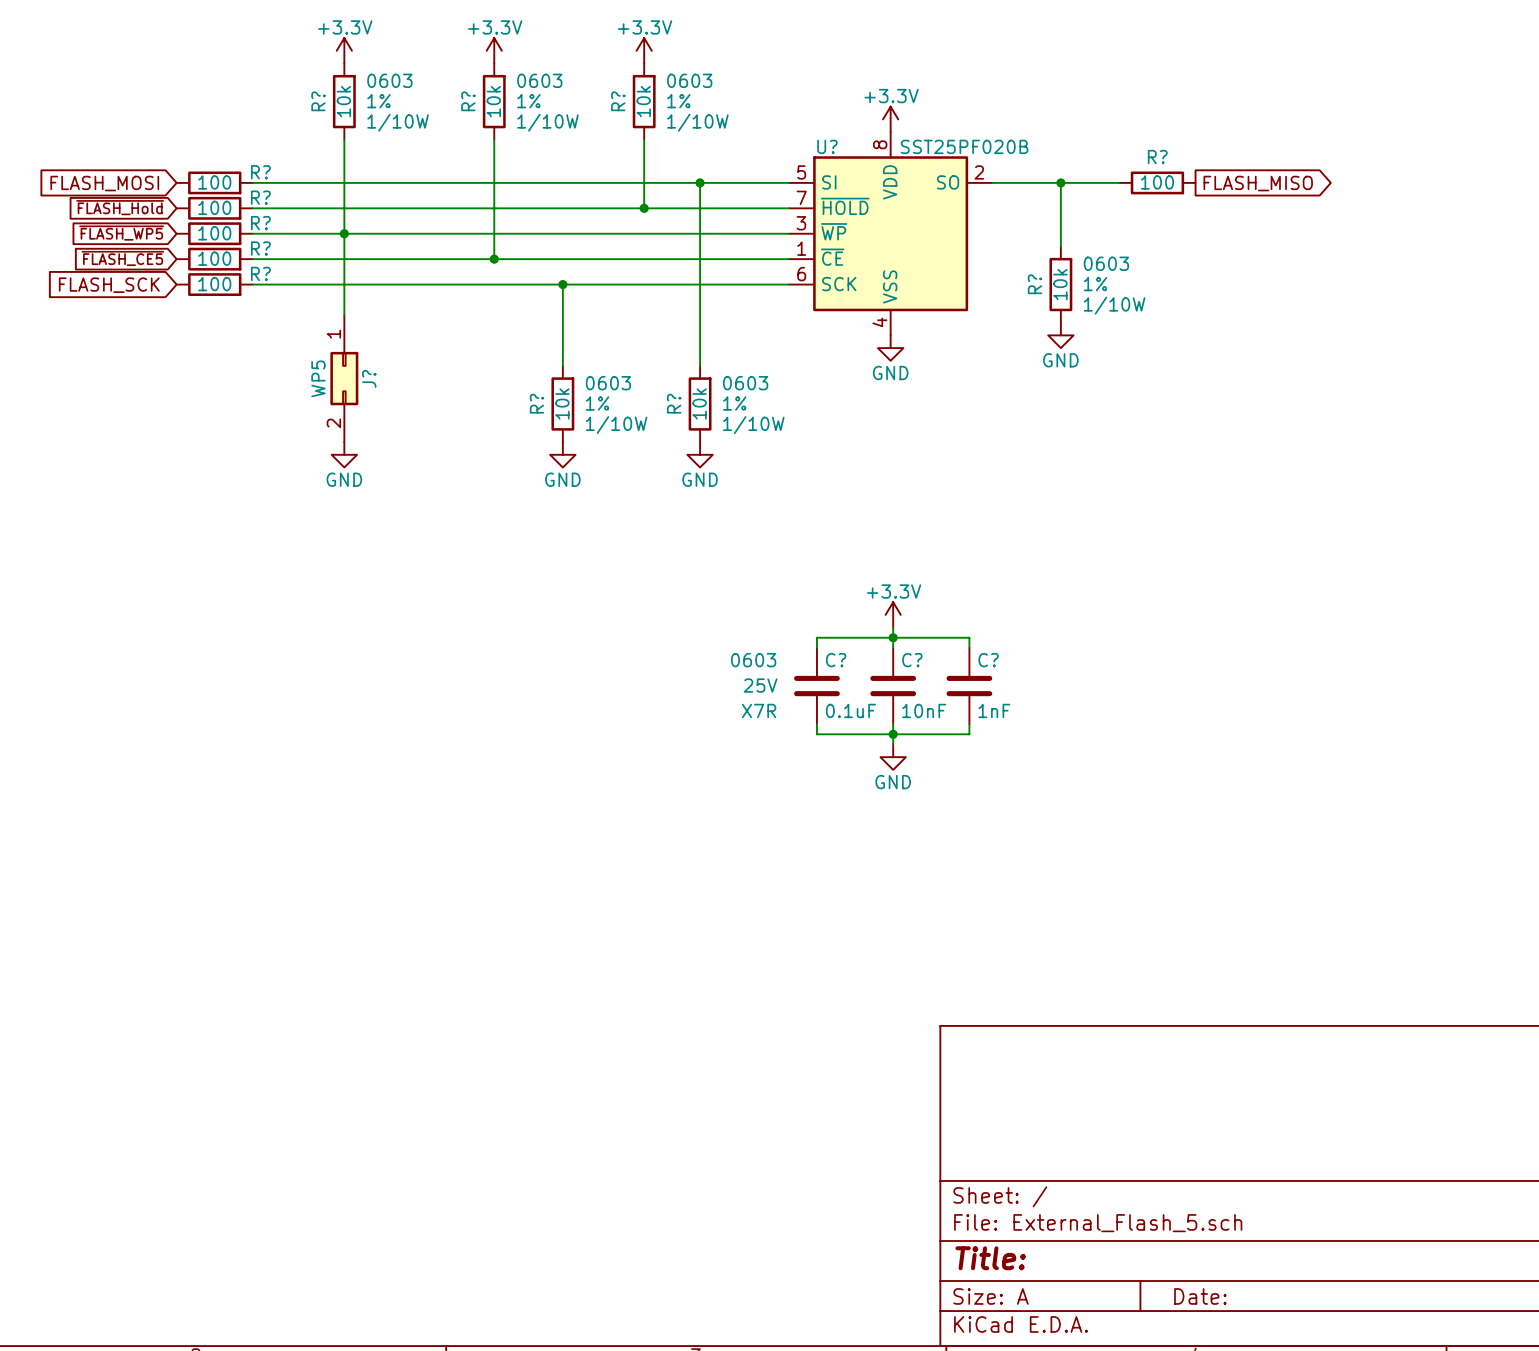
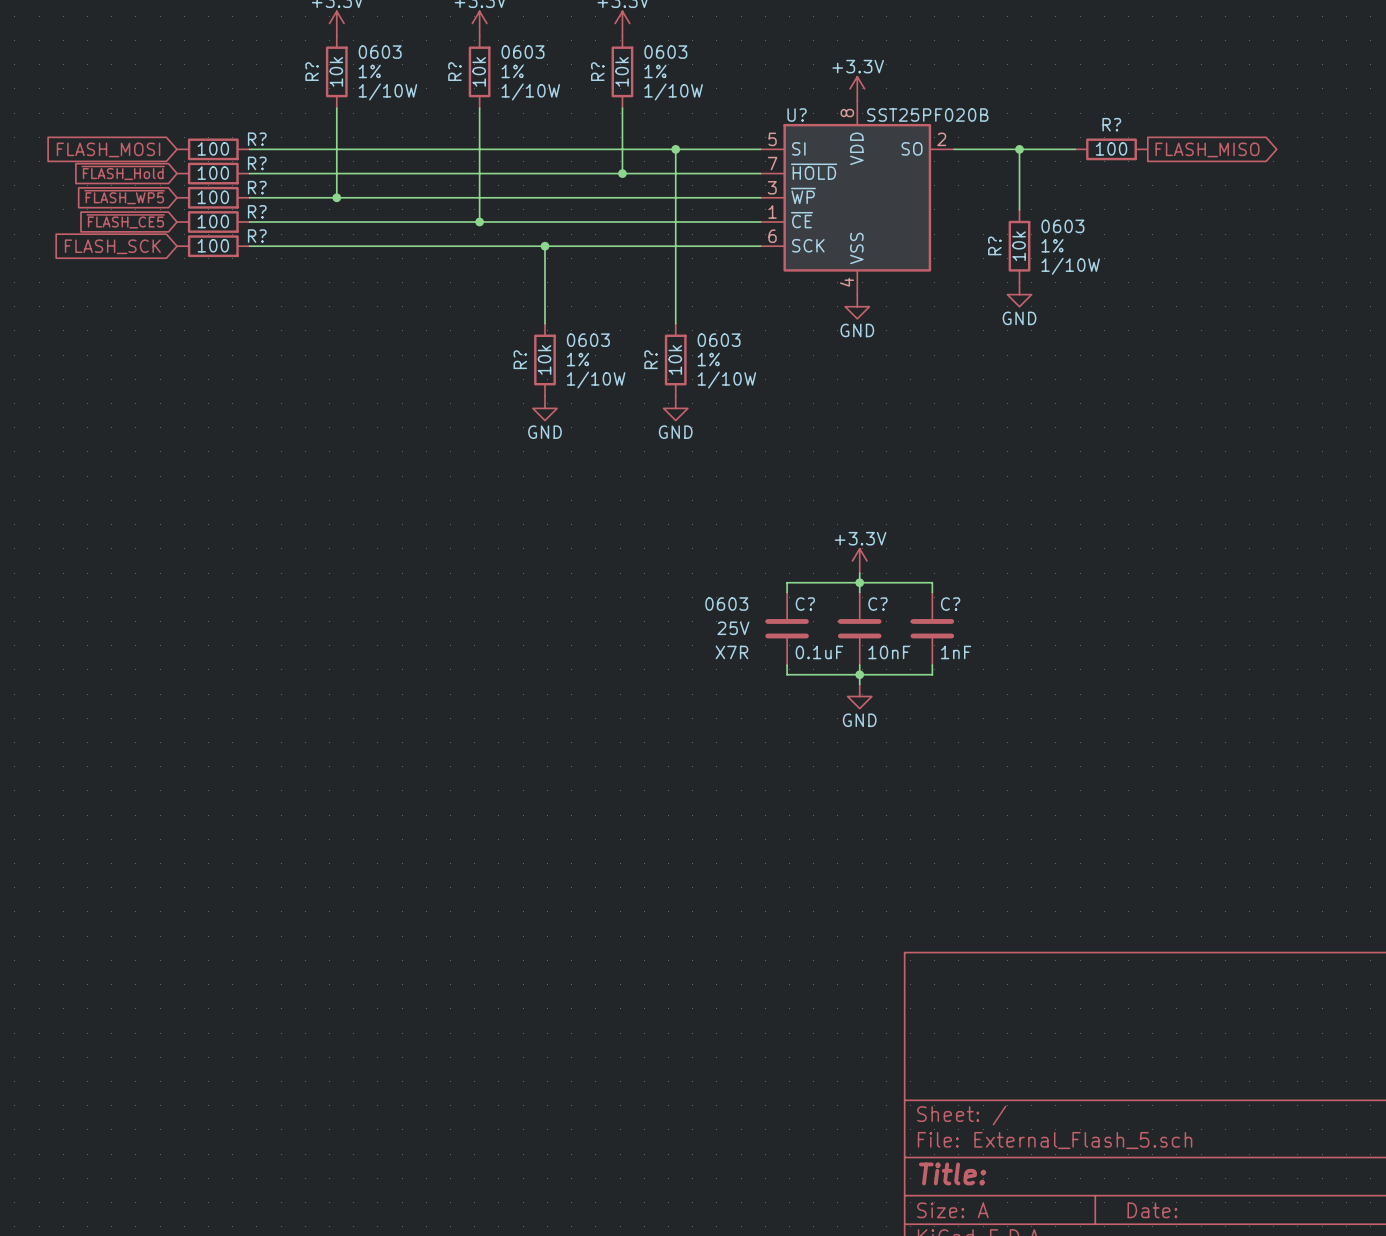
wire: (344, 233) (344, 315) -> none
J?: WP5 (344, 378) -> none
power symbol: GND (344, 454) -> none

